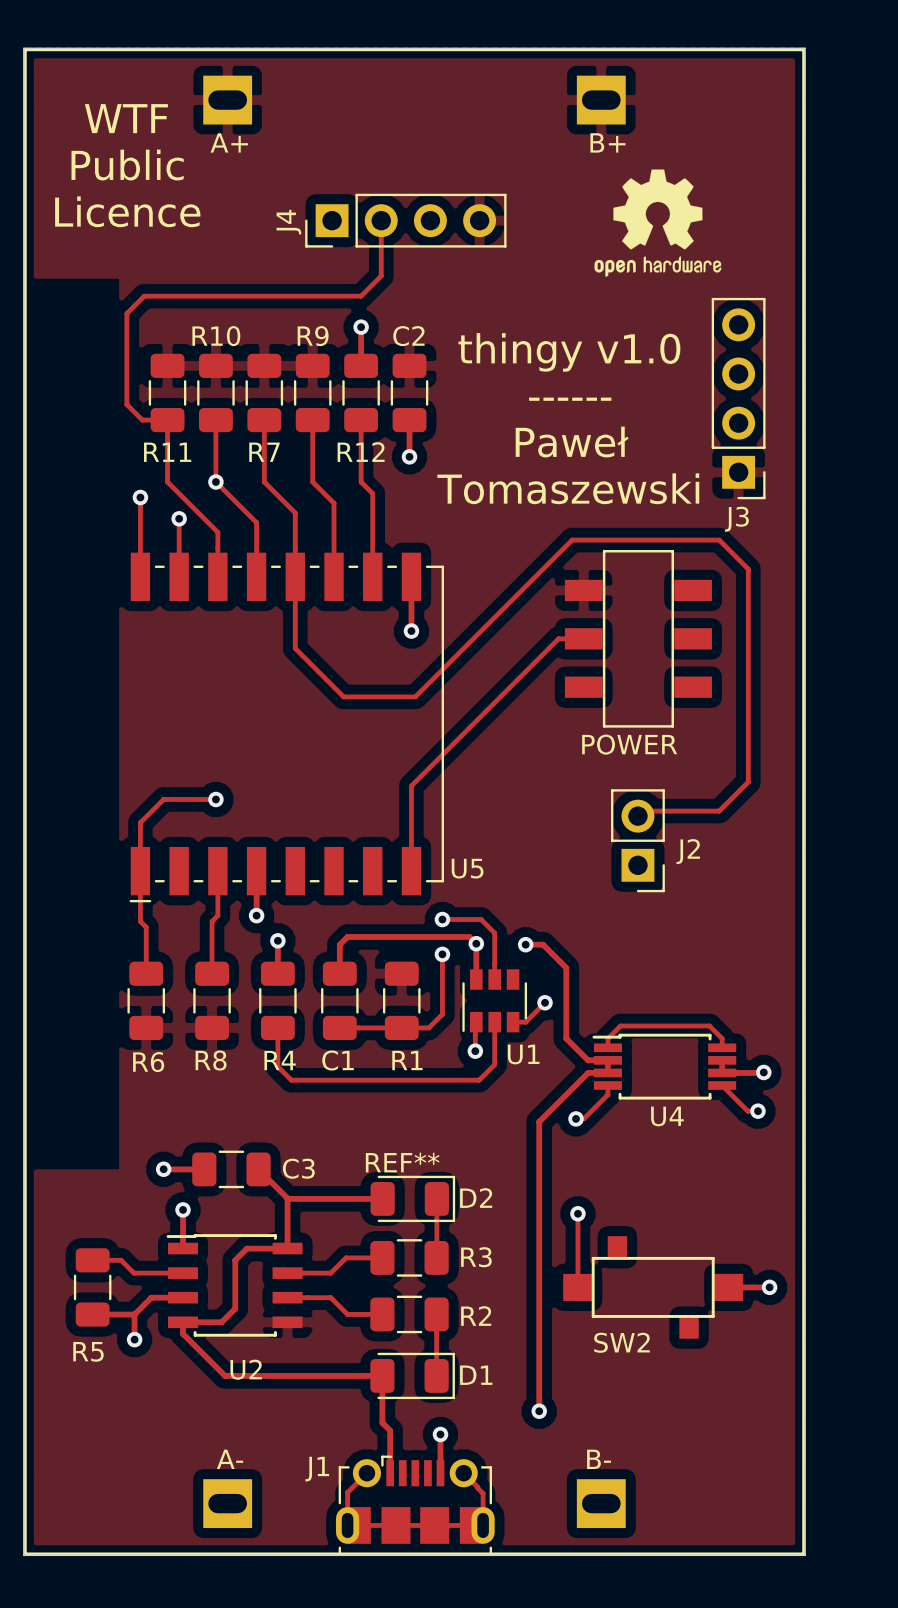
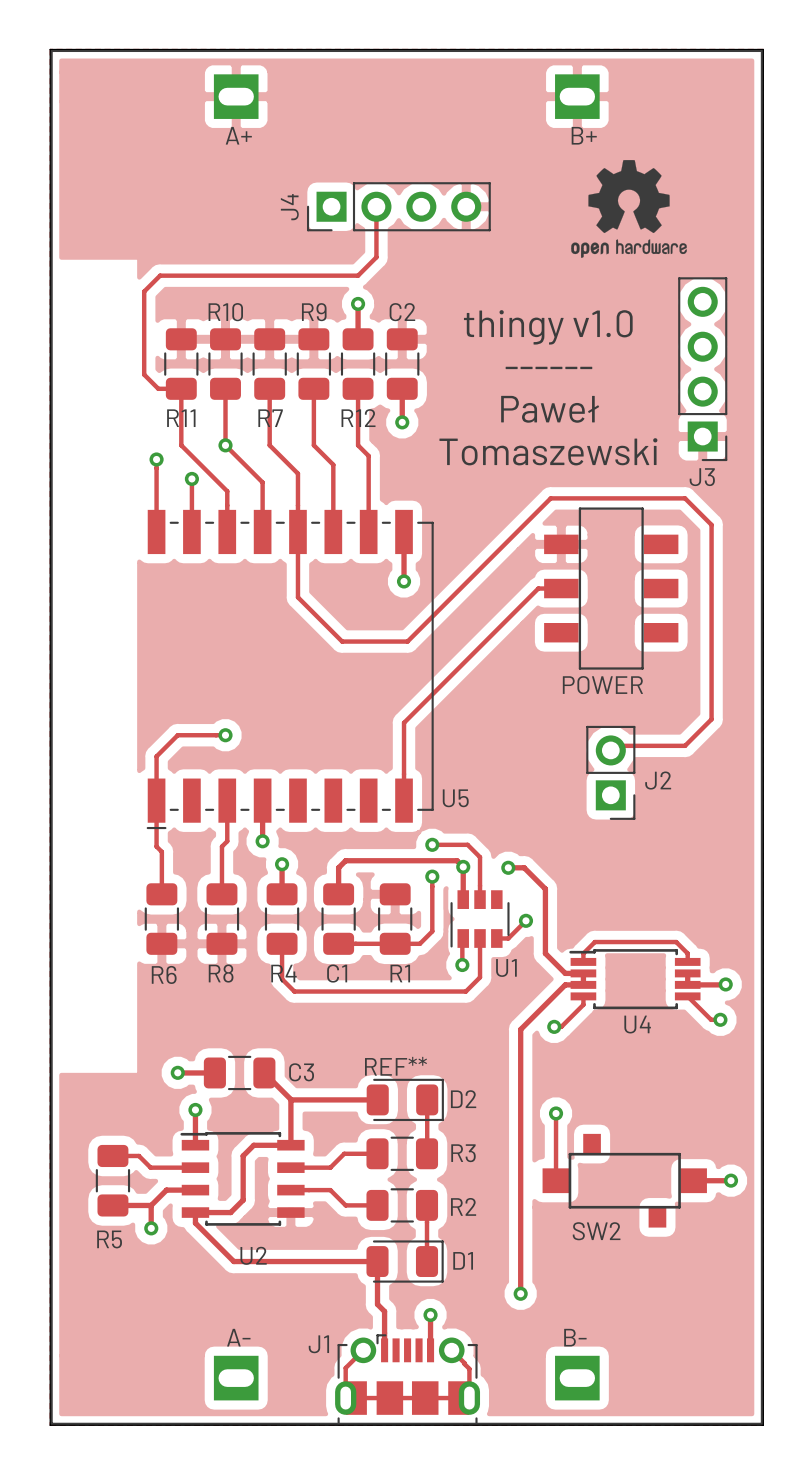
text: WTF (126, 118) -> none
text: Public (127, 165) -> none
text: Licence (127, 211) -> none

